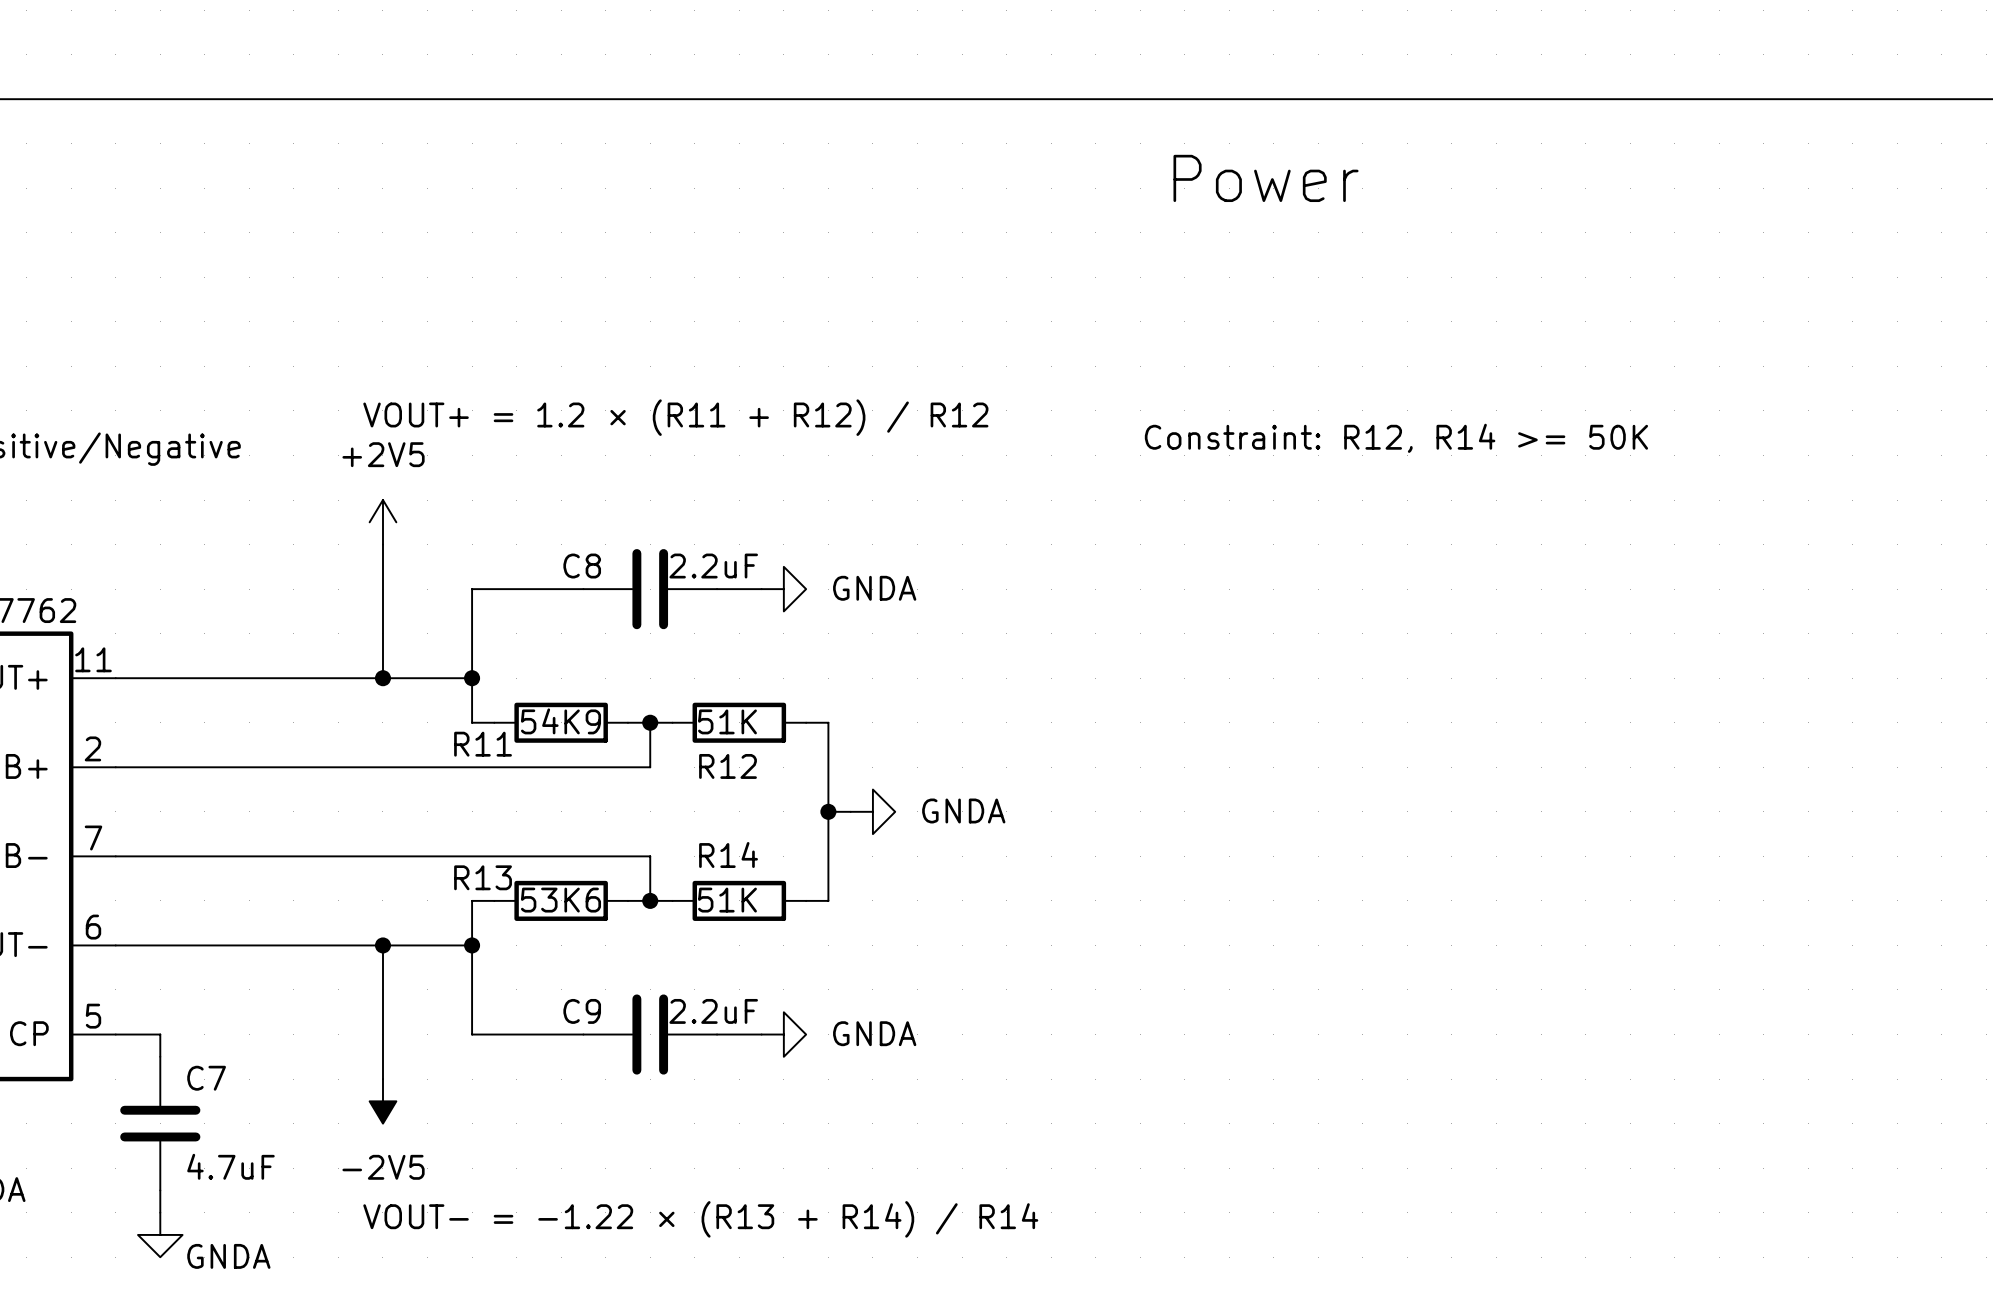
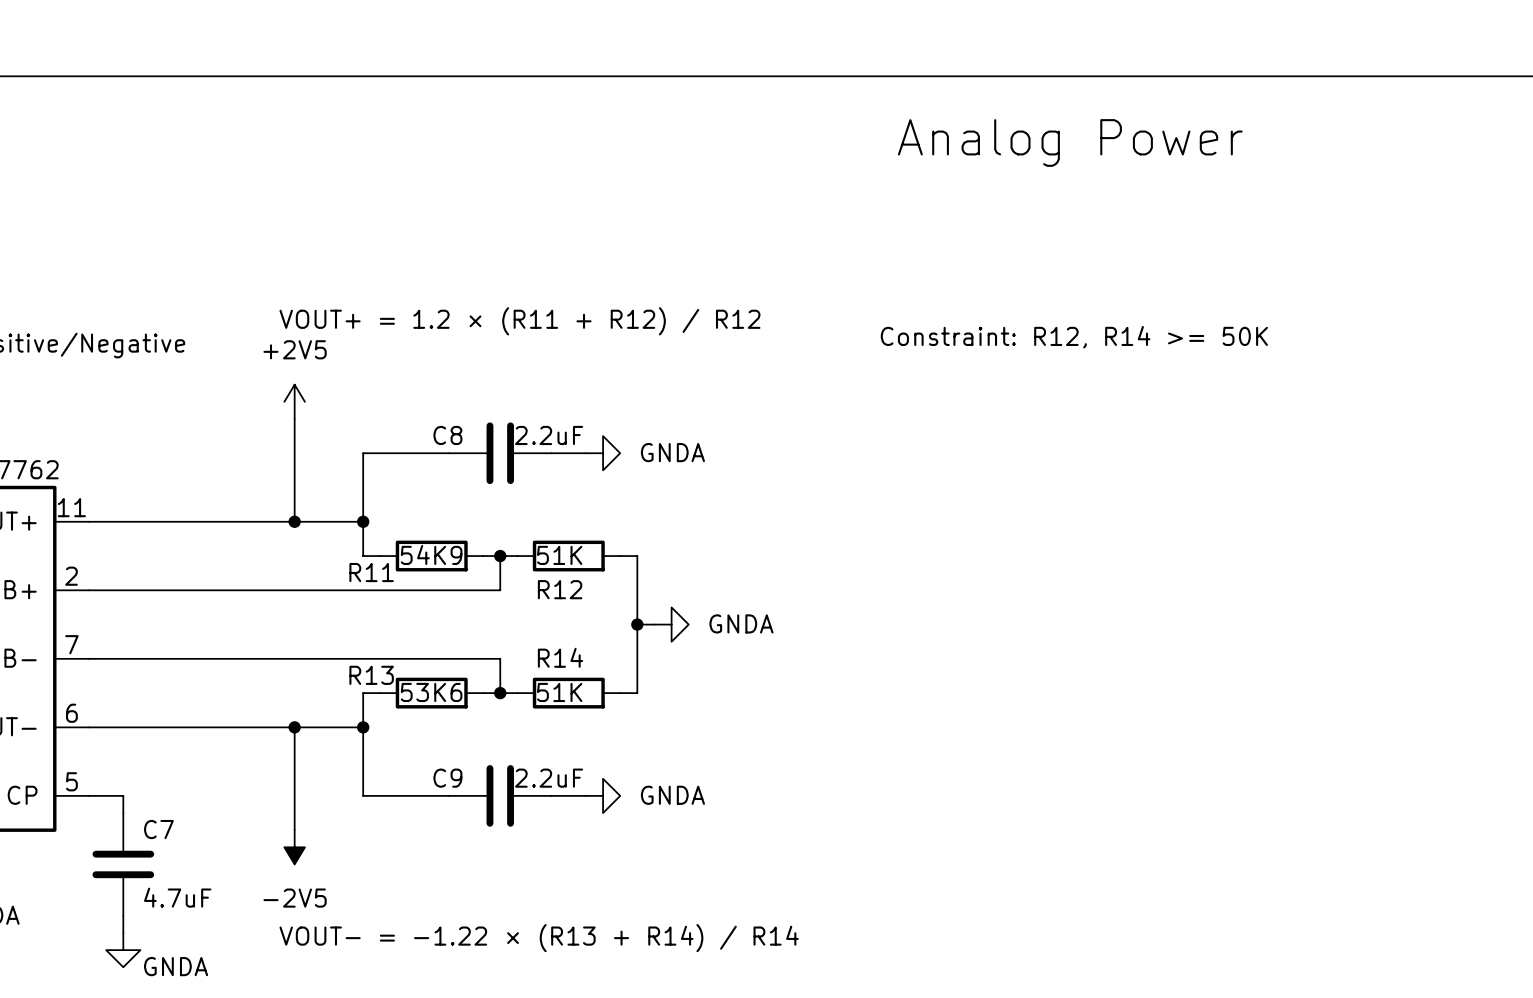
text: Power (1266, 178) -> Analog Power (1070, 142)

